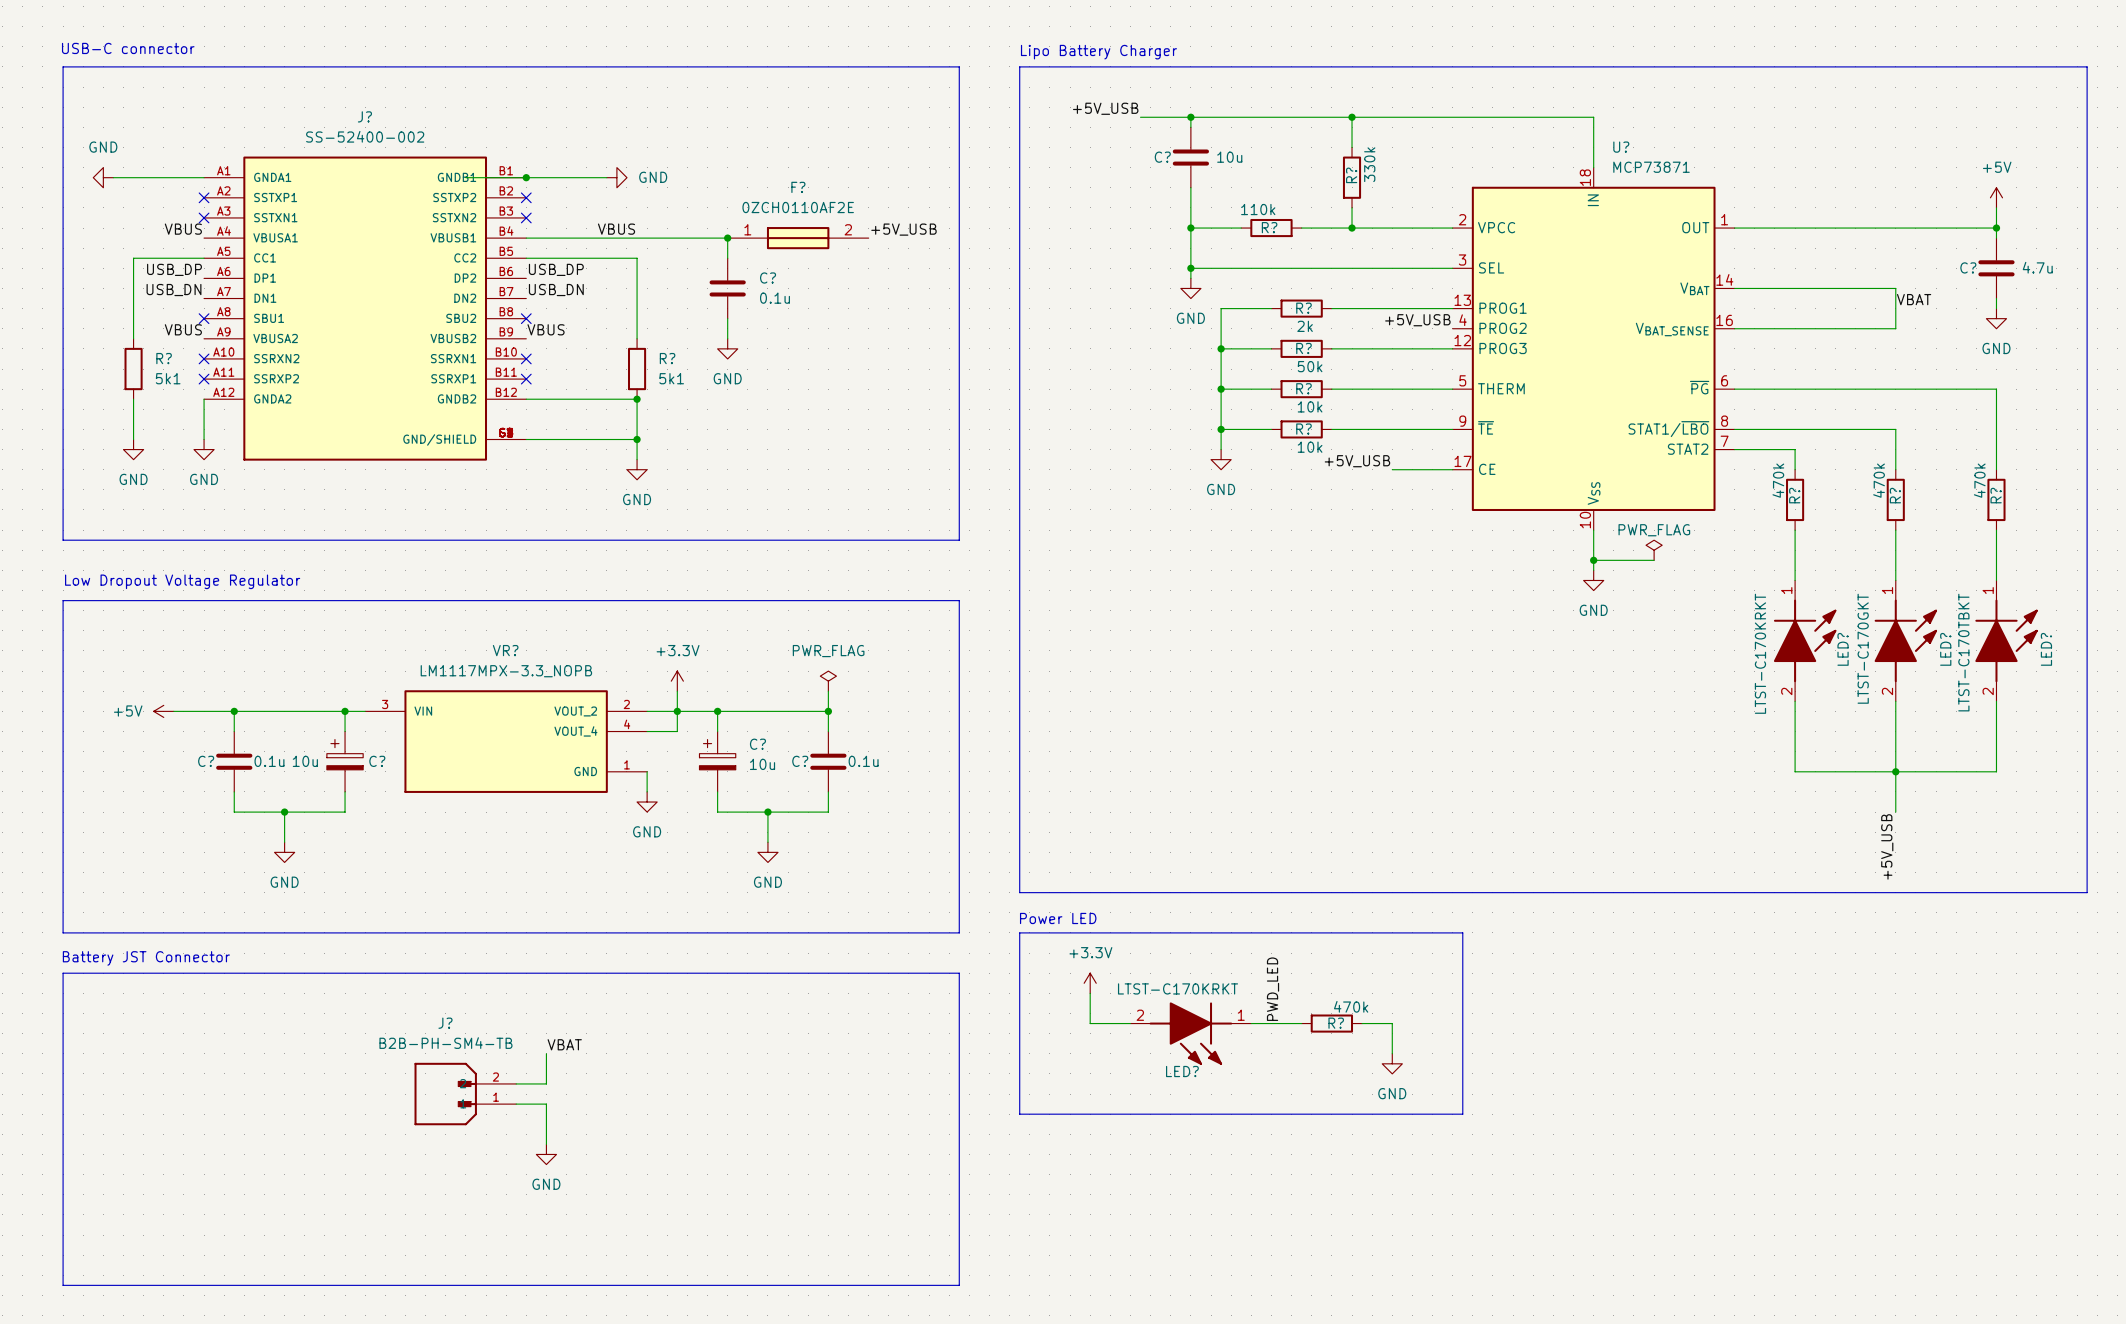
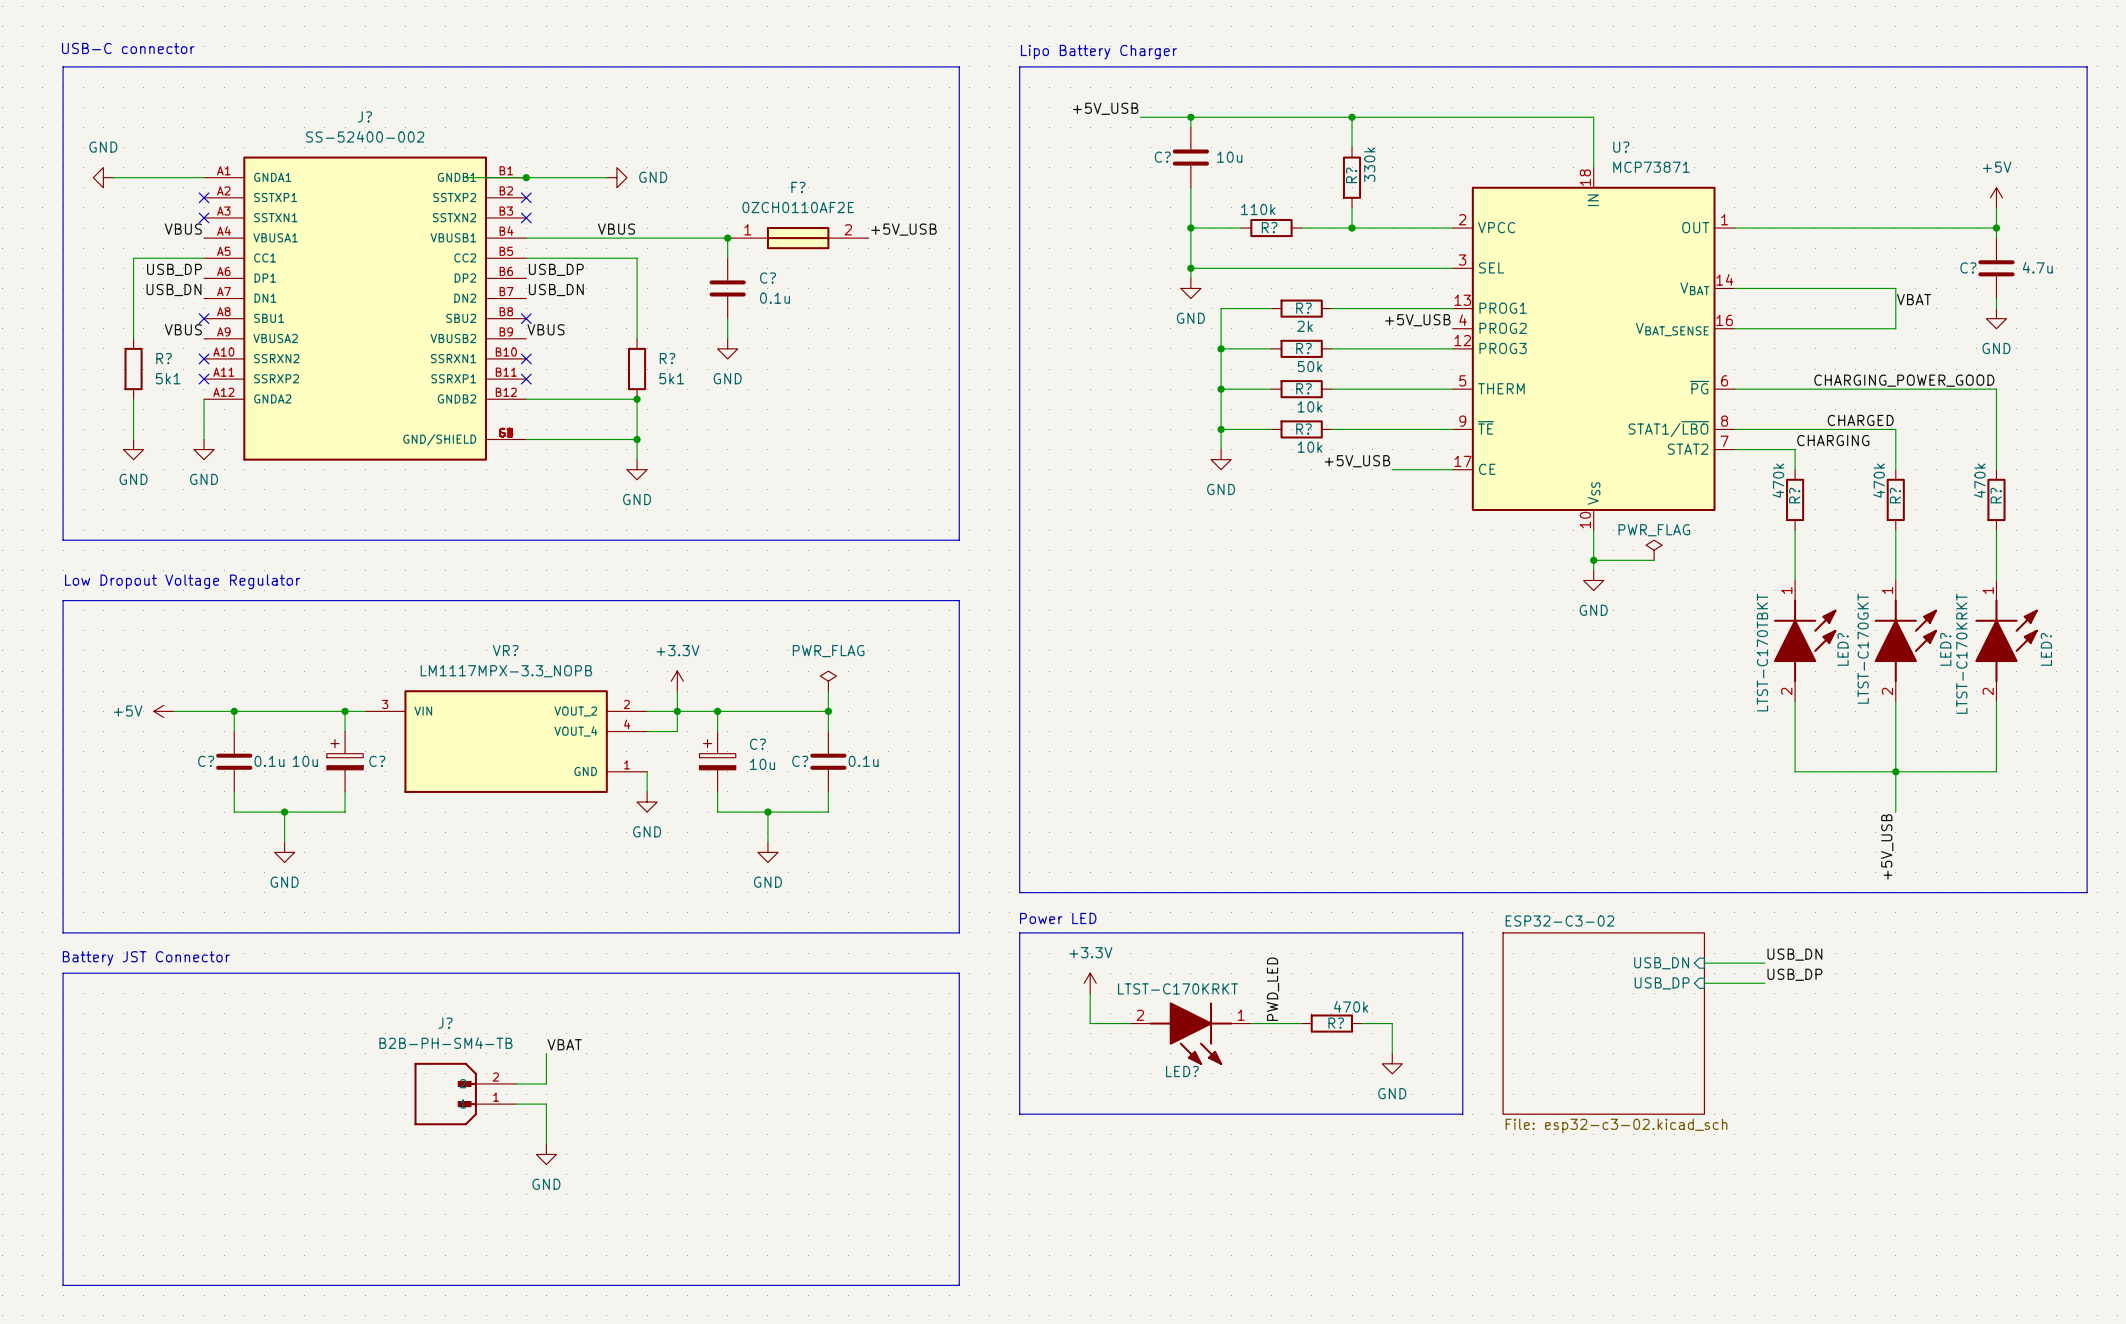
label: none -> CHARGING_POWER_GOOD (1904, 380)
label: none -> CHARGED (1860, 420)
label: none -> CHARGING (1833, 440)
LED? value: LTST-C170TBKT (1963, 652) -> LTST-C170KRKT (1961, 653)
LED? value: LTST-C170KRKT (1760, 653) -> LTST-C170TBKT (1762, 652)
label: none -> USB_DN (1794, 954)
sheet pin: none -> USB_DN (1661, 963)
wire: none -> (1704, 963) (1764, 963)
label: none -> USB_DP (1794, 974)
sheet pin: none -> USB_DP (1662, 983)
wire: none -> (1704, 983) (1764, 983)
sheet ESP32-C3-02: none -> File: esp32-c3-02.kicad_sch (1603, 1023)

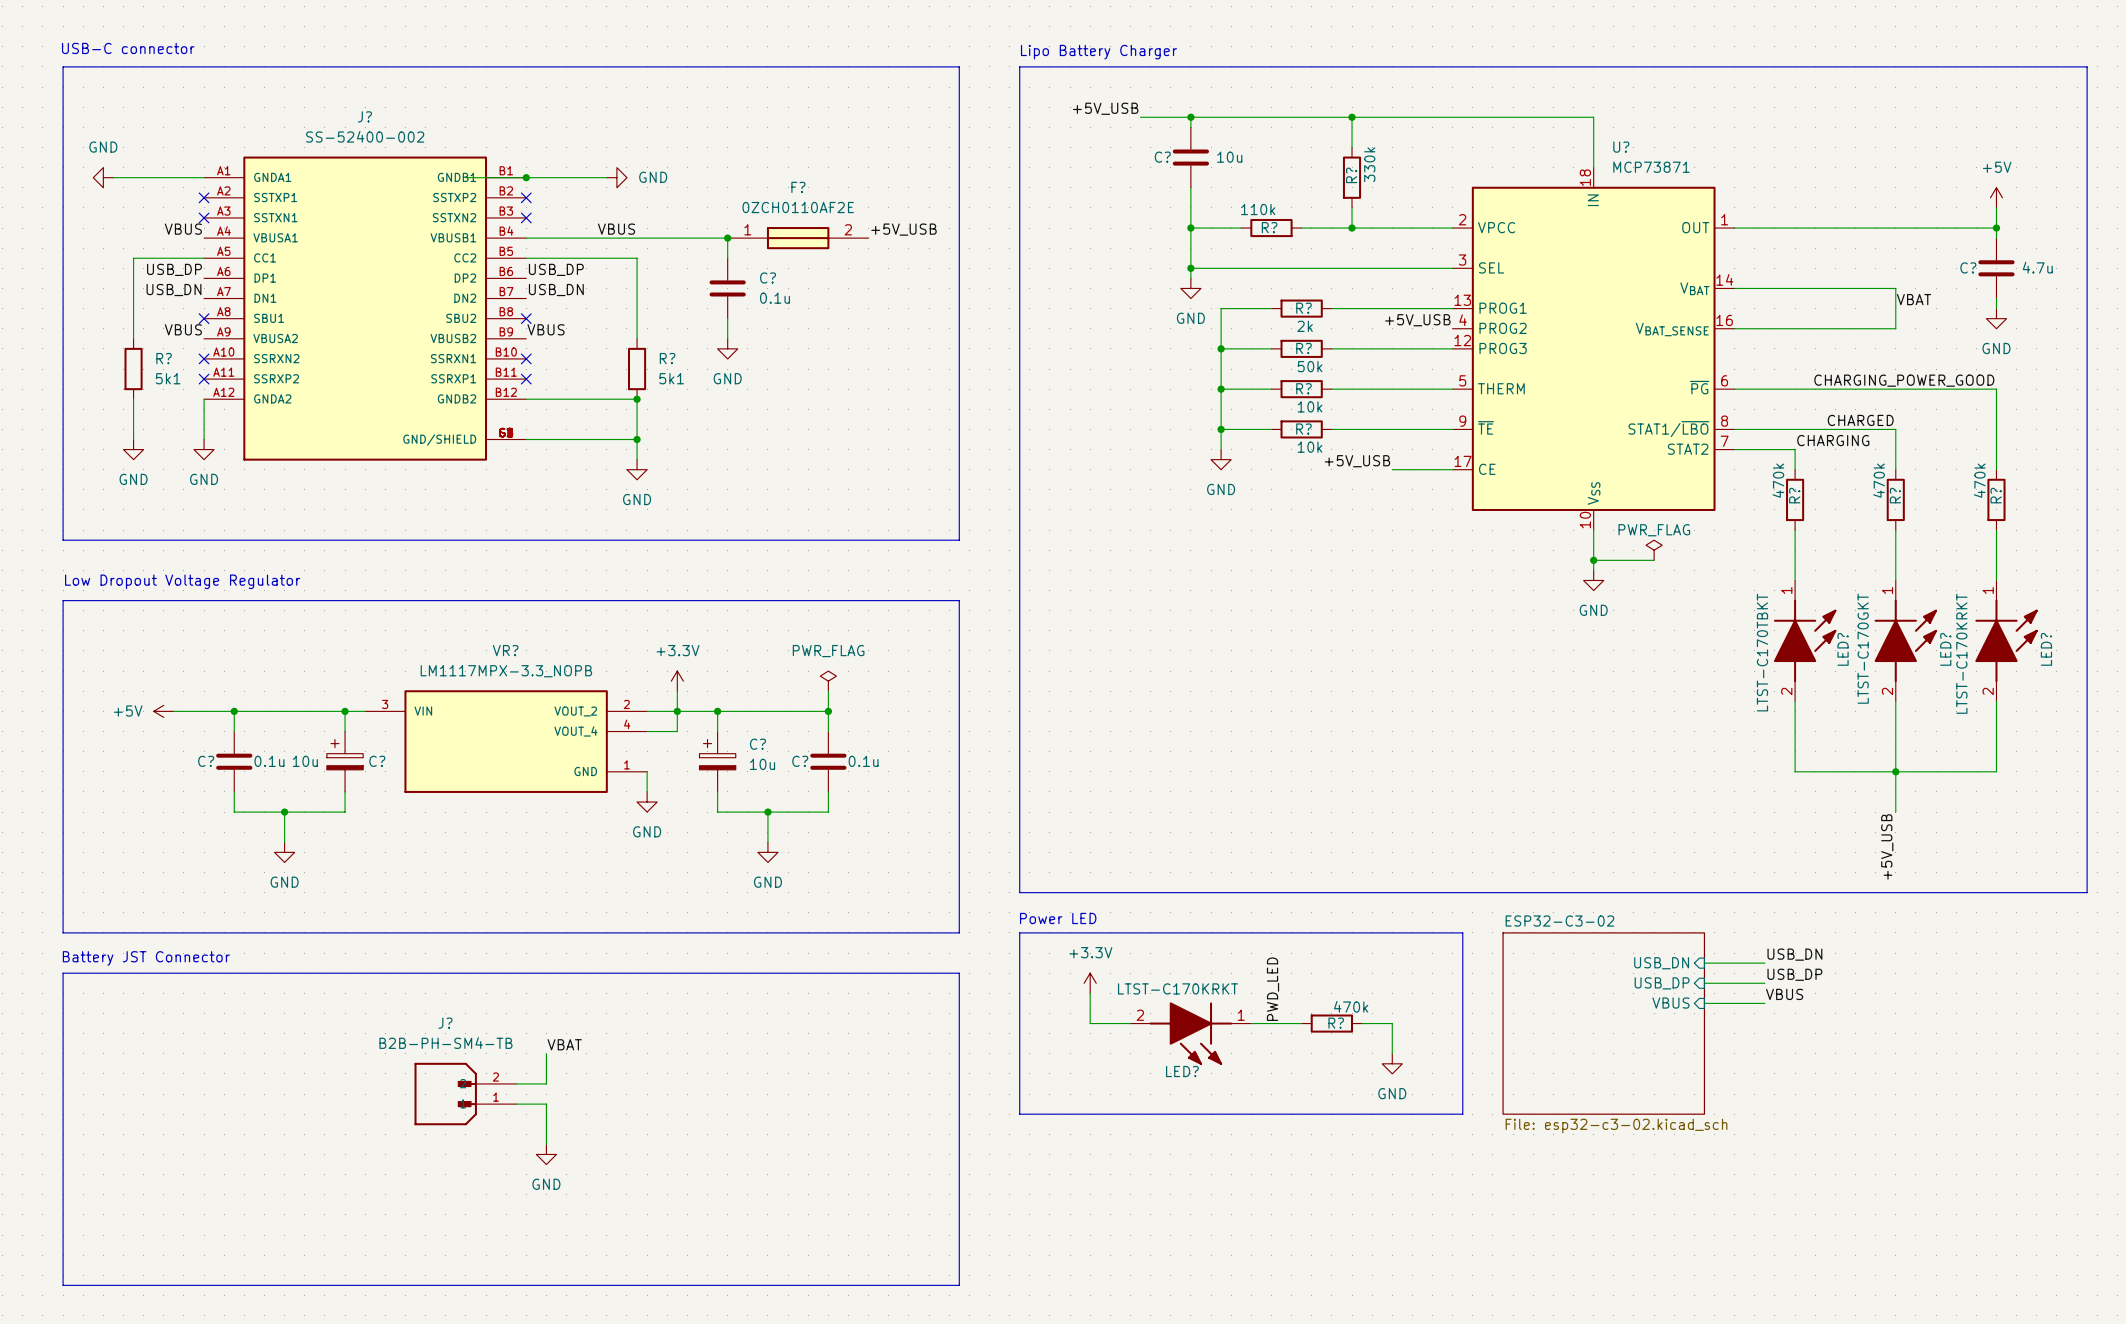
label: none -> VBUS (1784, 994)
sheet pin: none -> VBUS (1670, 1003)
wire: none -> (1704, 1003) (1764, 1003)

